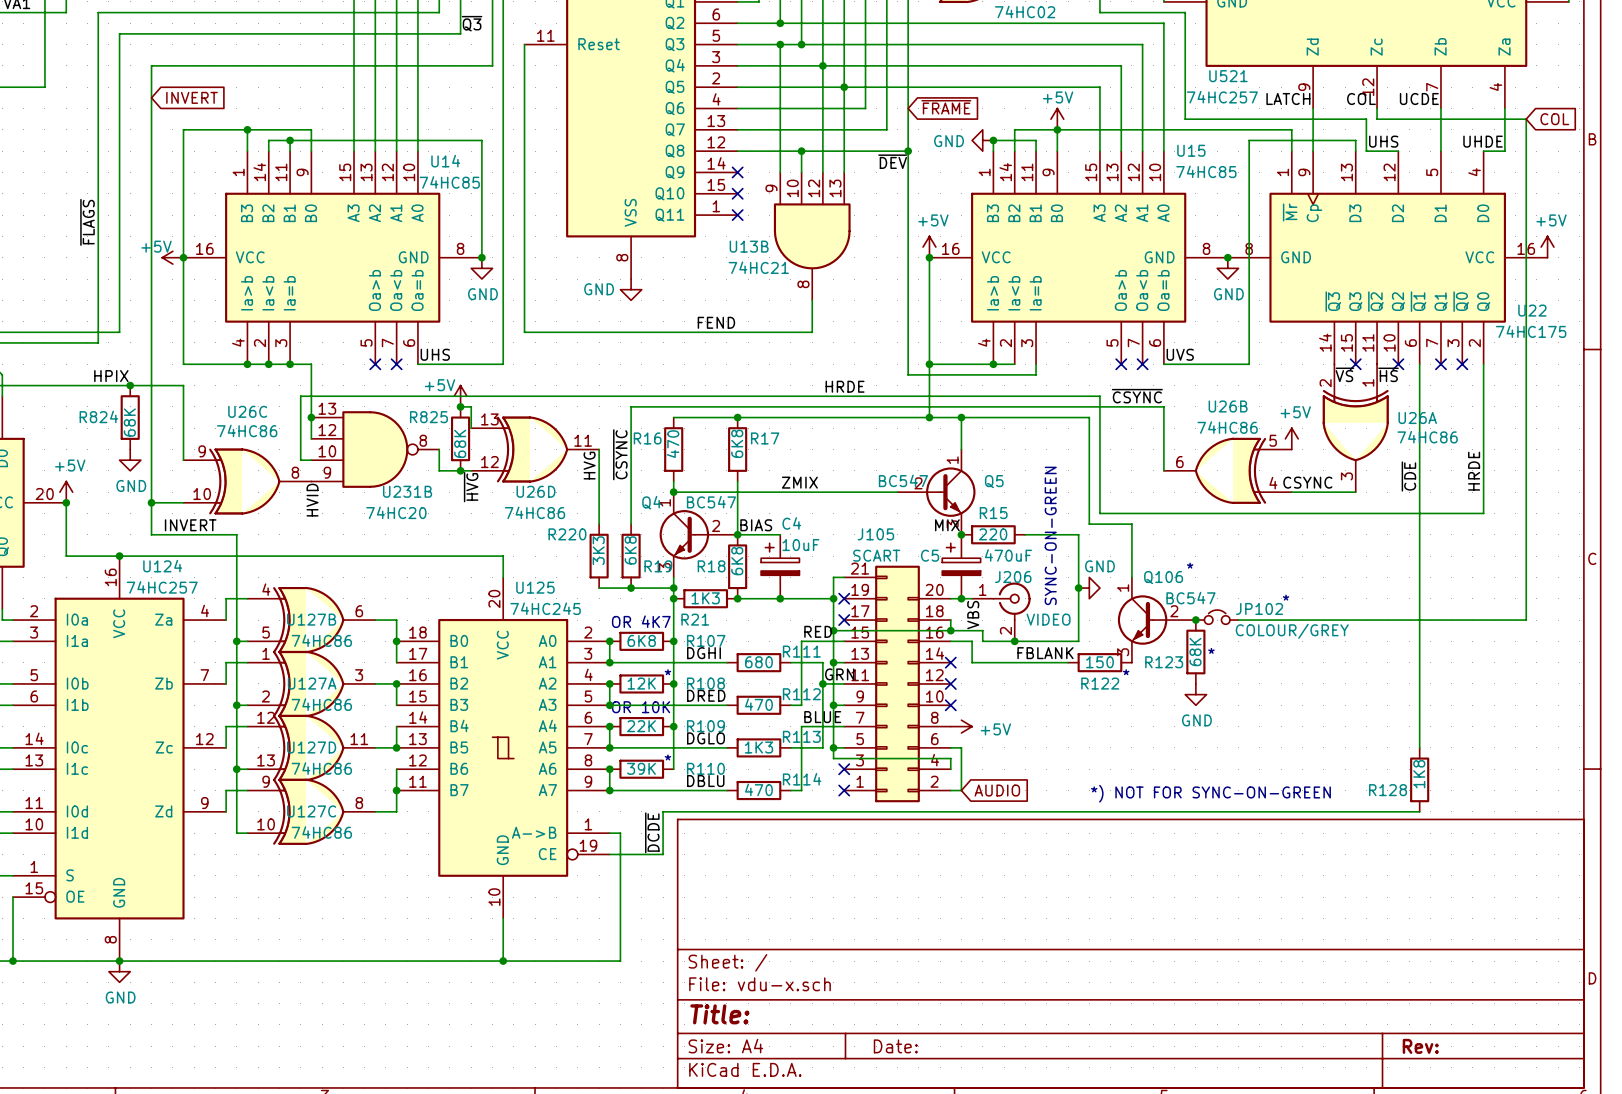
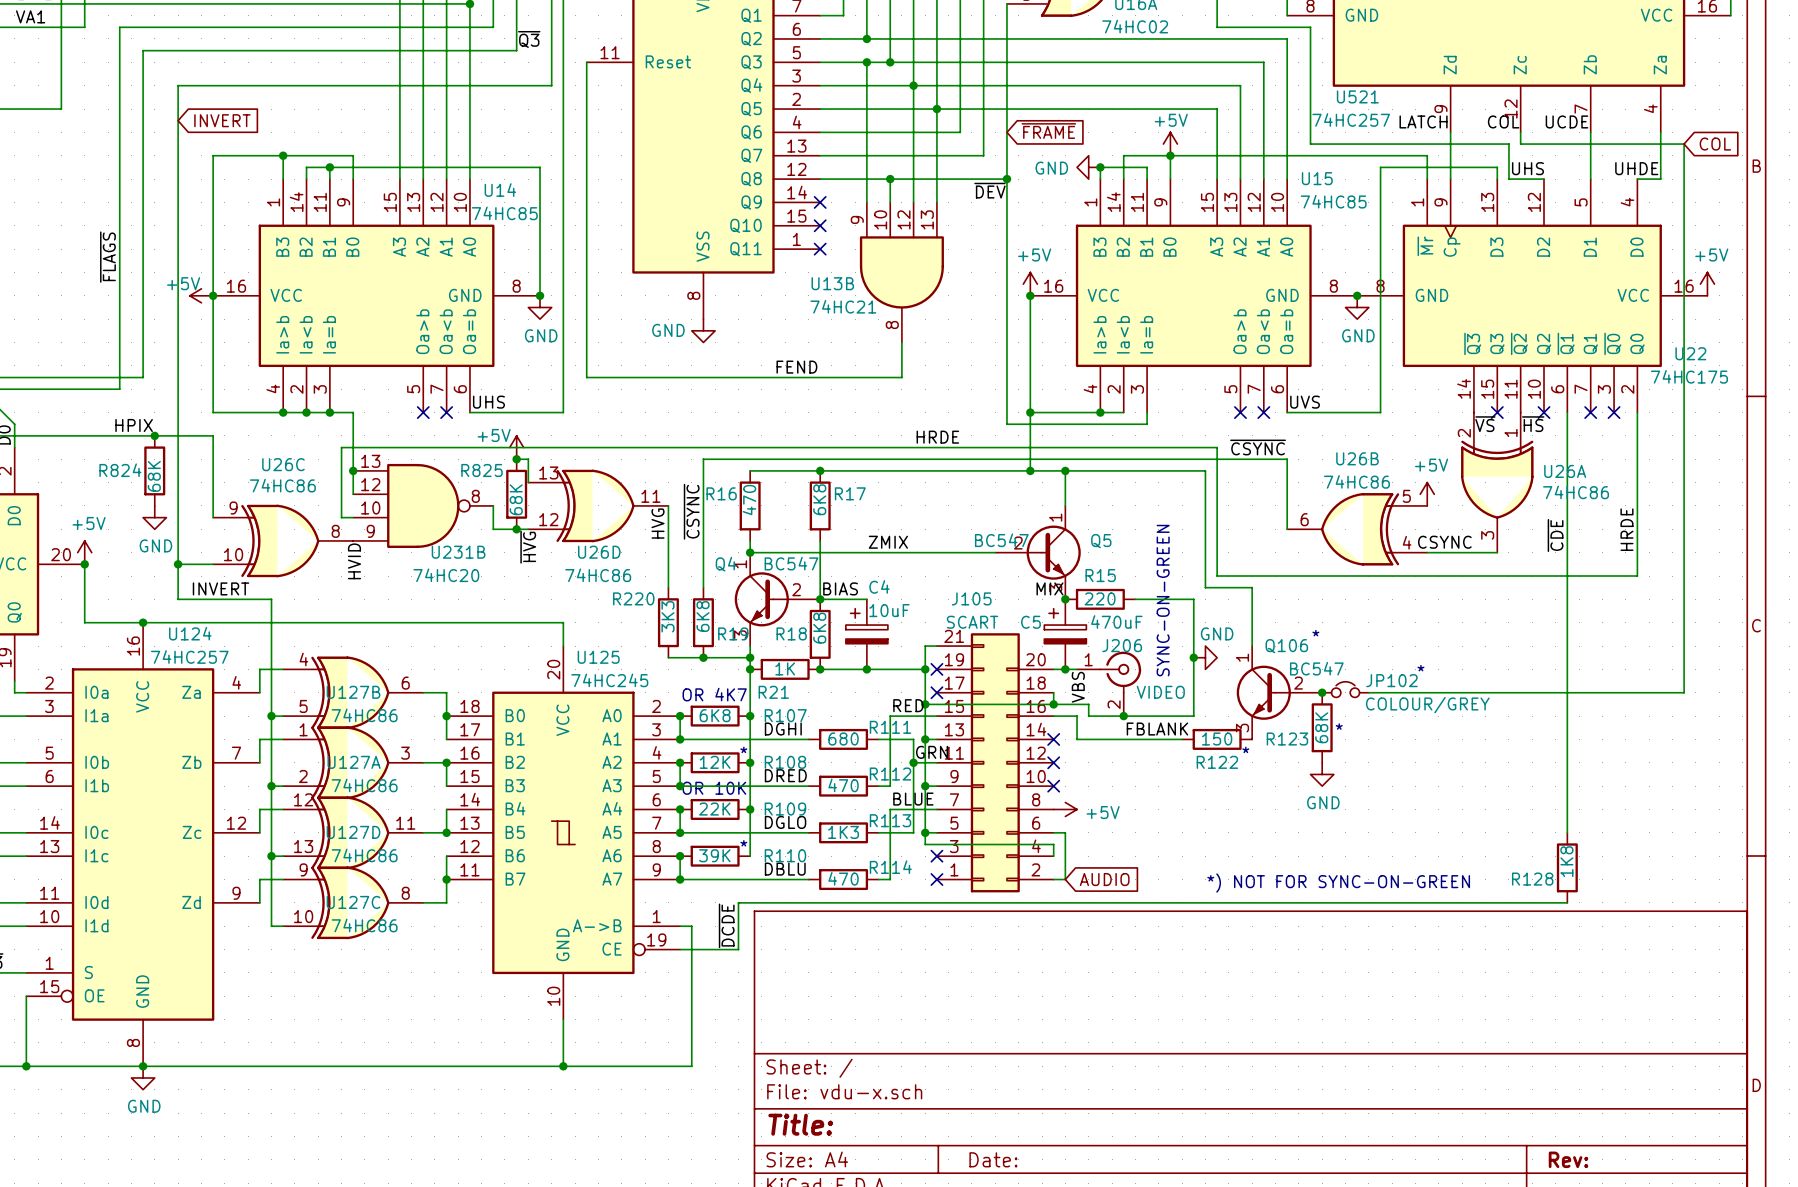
R21 value: 1K3 (705, 598) -> 1K (785, 668)

